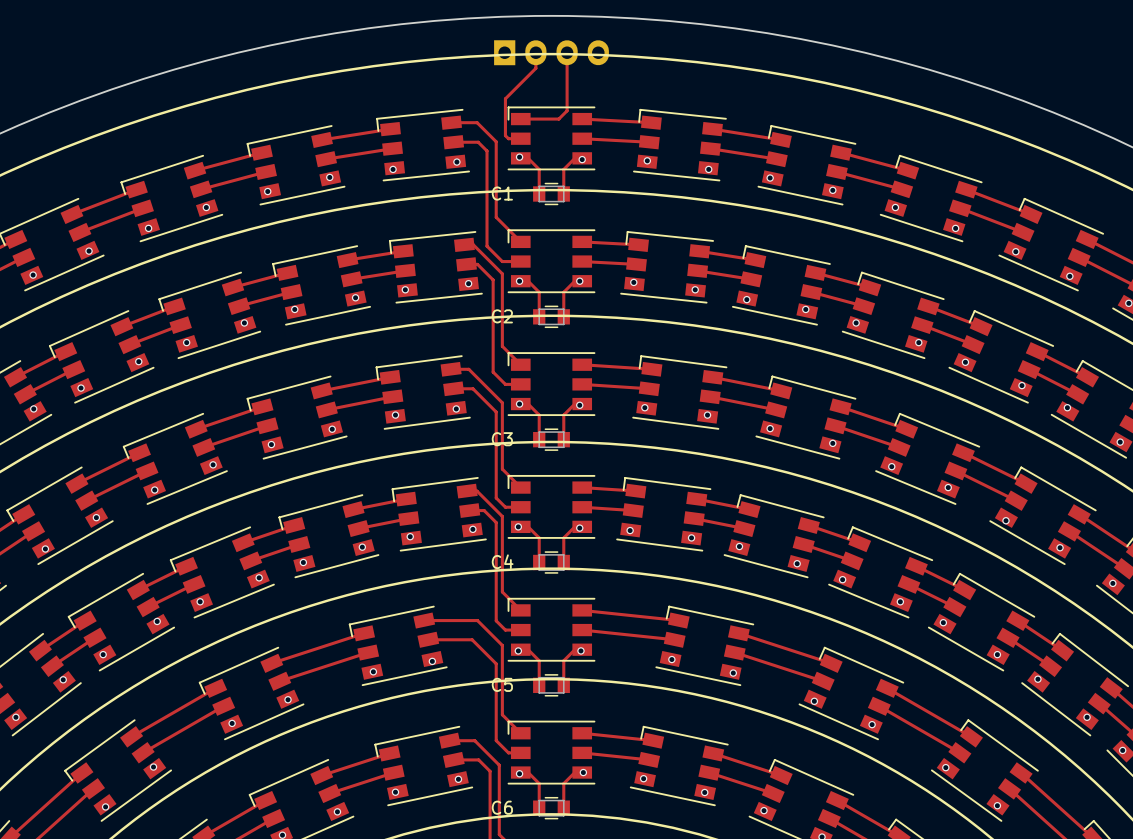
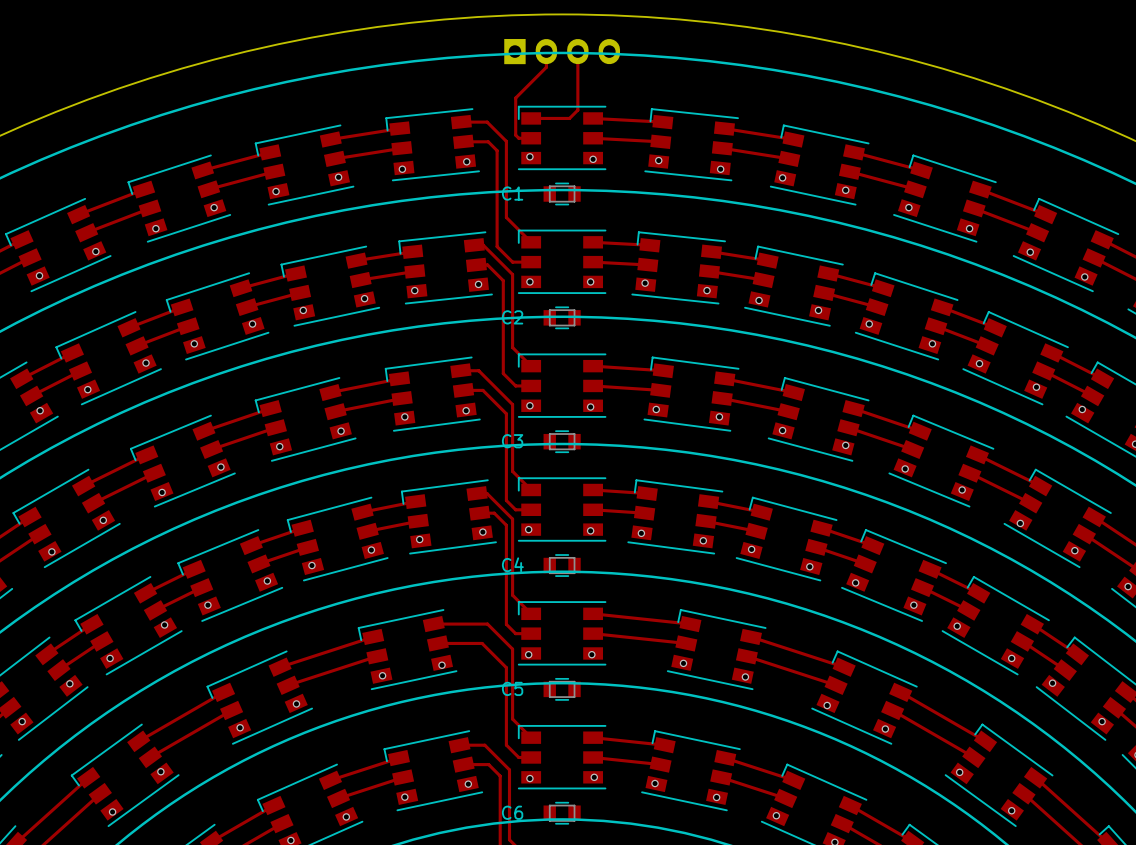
track: (520, 158) (528, 158) (539, 169) (539, 193) -> none
track: (582, 158) (574, 158) (563, 169) (563, 193) -> none
track: (520, 281) (528, 281) (539, 292) (539, 316) -> none
track: (579, 281) (574, 281) (563, 292) (563, 316) -> none
track: (520, 404) (528, 404) (539, 415) (539, 439) -> none
track: (582, 404) (574, 404) (563, 415) (563, 439) -> none
track: (520, 526) (528, 526) (539, 537) (539, 562) -> none
track: (582, 526) (574, 526) (563, 537) (563, 562) -> none
track: (520, 649) (528, 649) (539, 660) (539, 685) -> none
track: (582, 649) (574, 649) (563, 660) (563, 685) -> none
track: (520, 772) (528, 772) (539, 783) (539, 808) -> none
track: (582, 772) (574, 772) (563, 783) (563, 808) -> none

